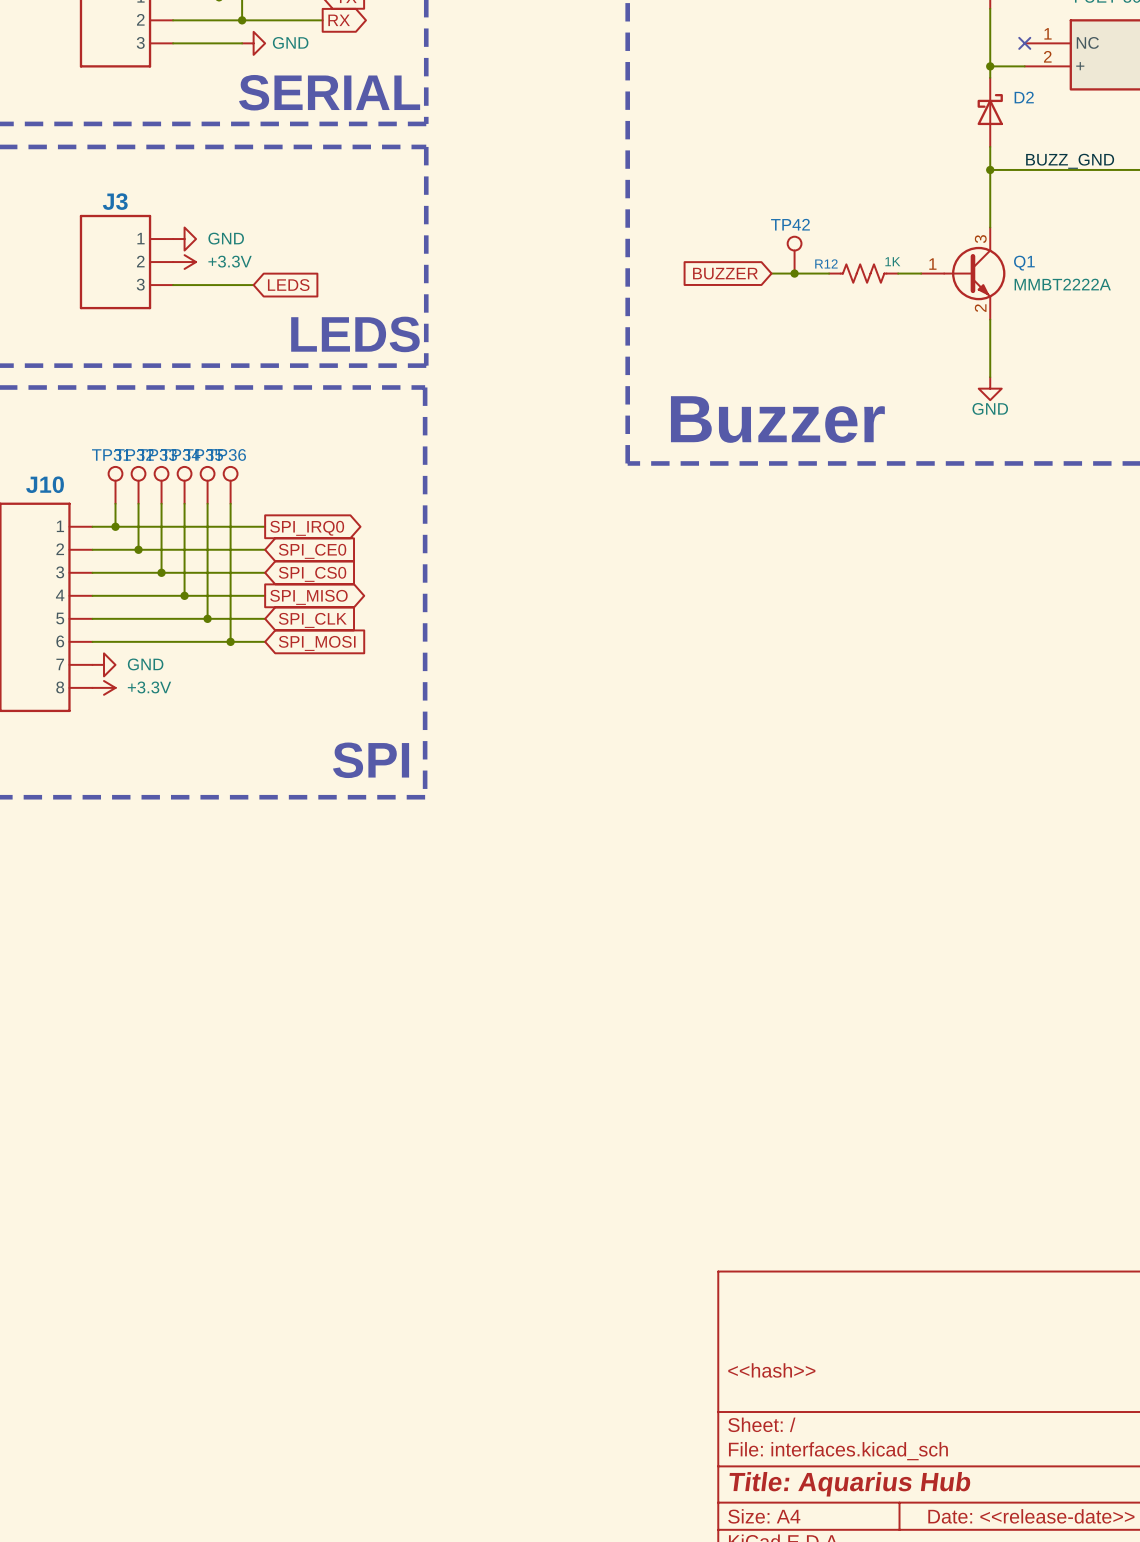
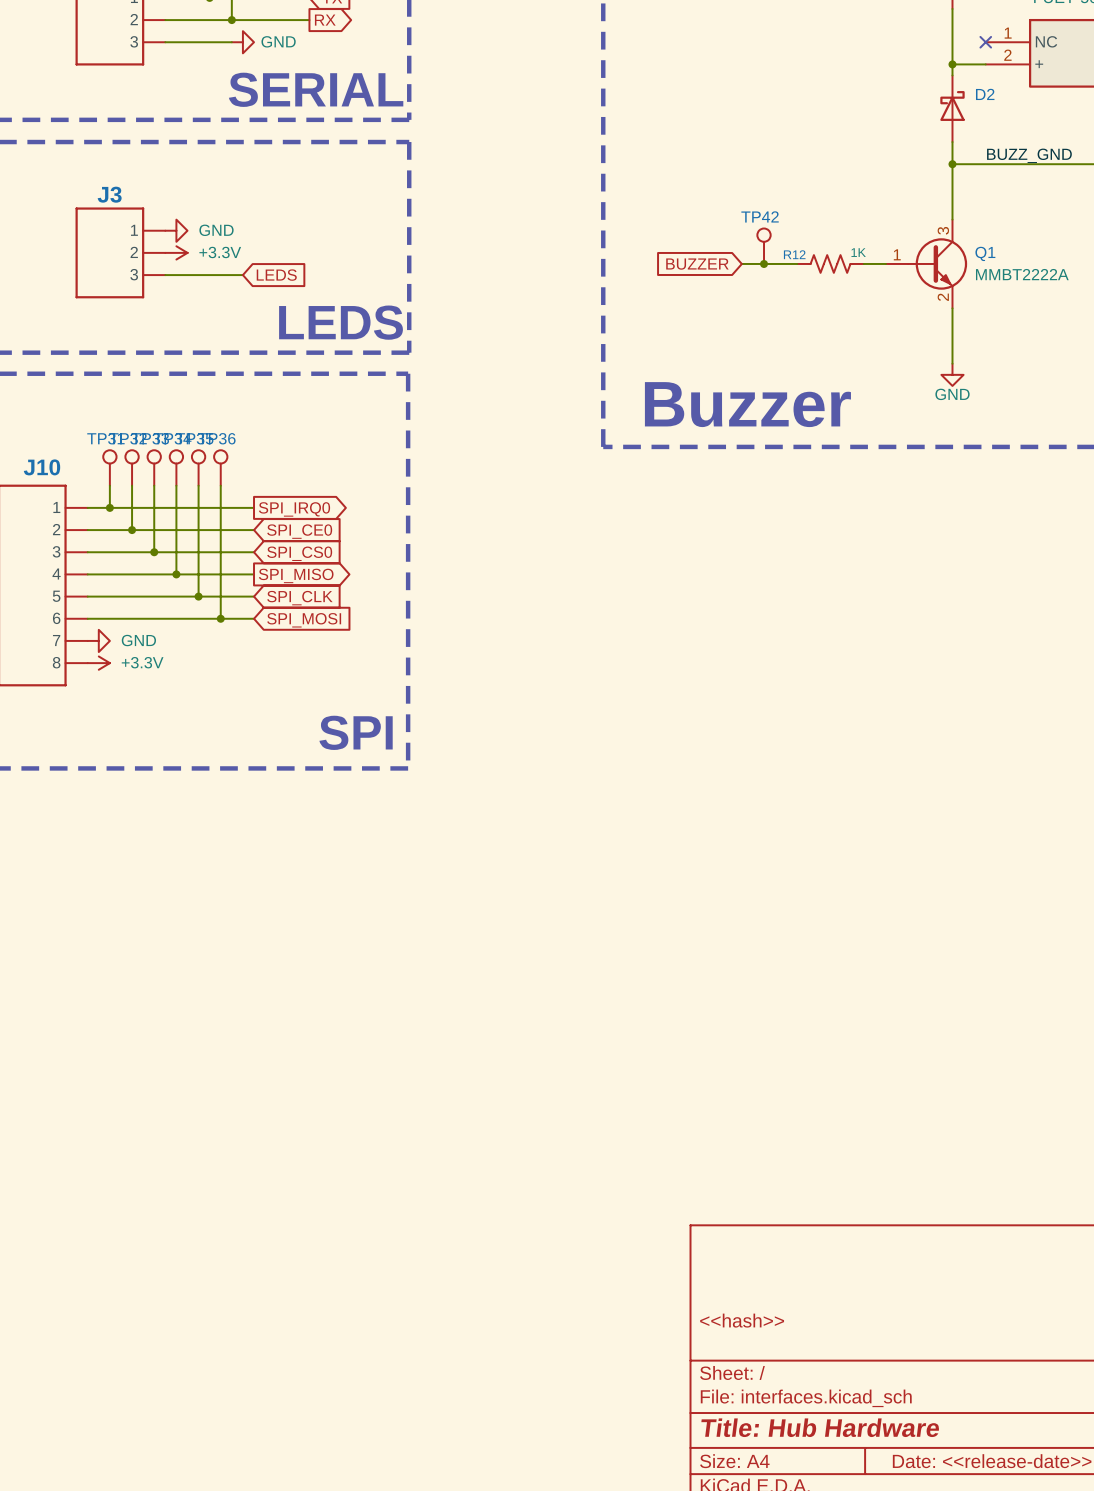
title block: Title: Aquarius Hub (850, 1484) -> Title: Hub Hardware (820, 1427)

